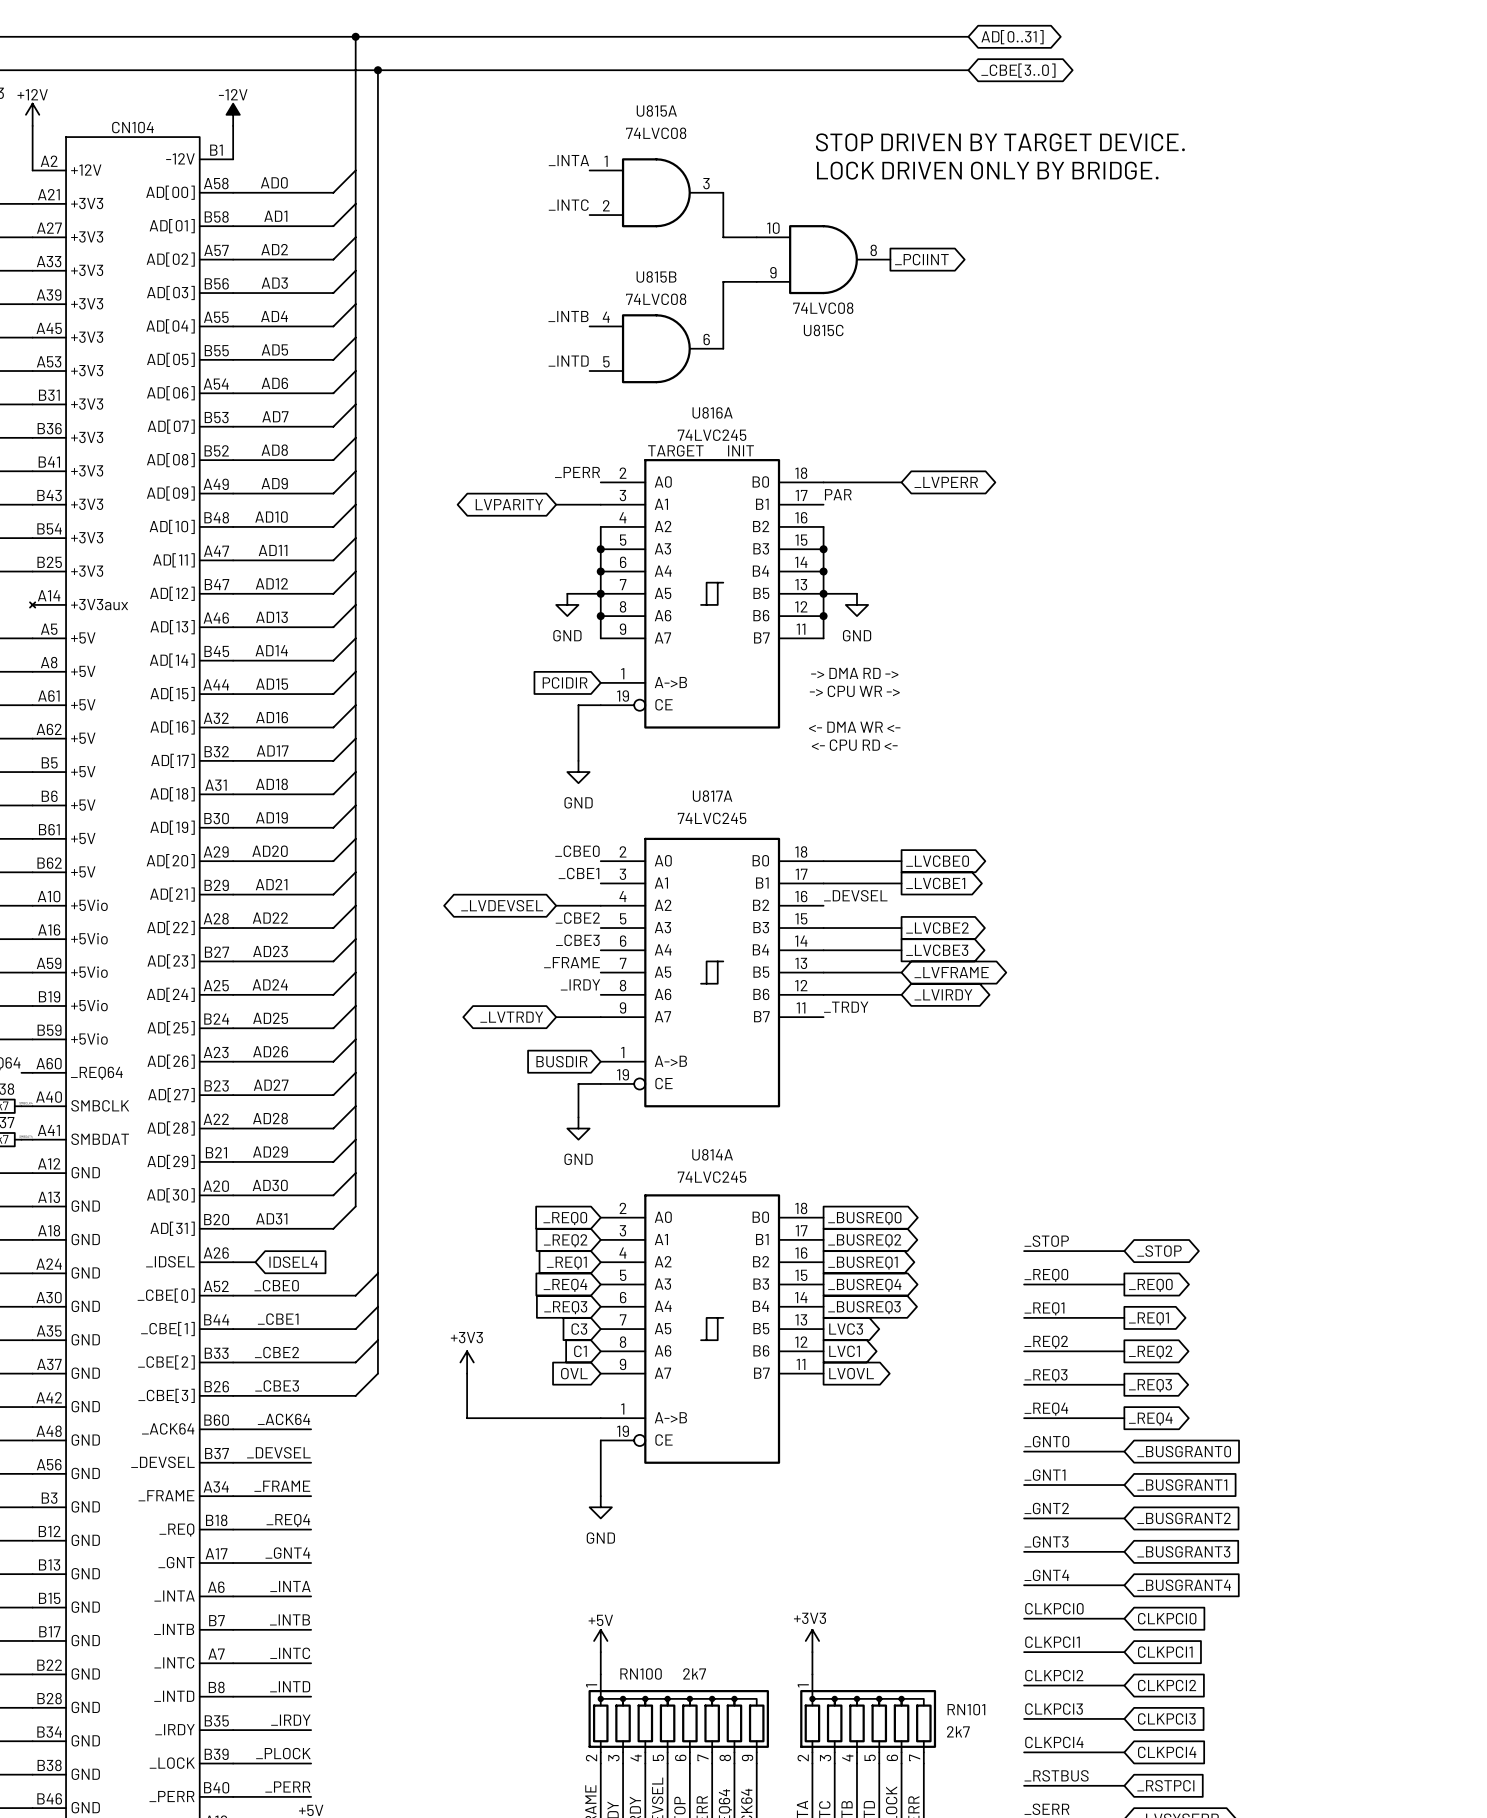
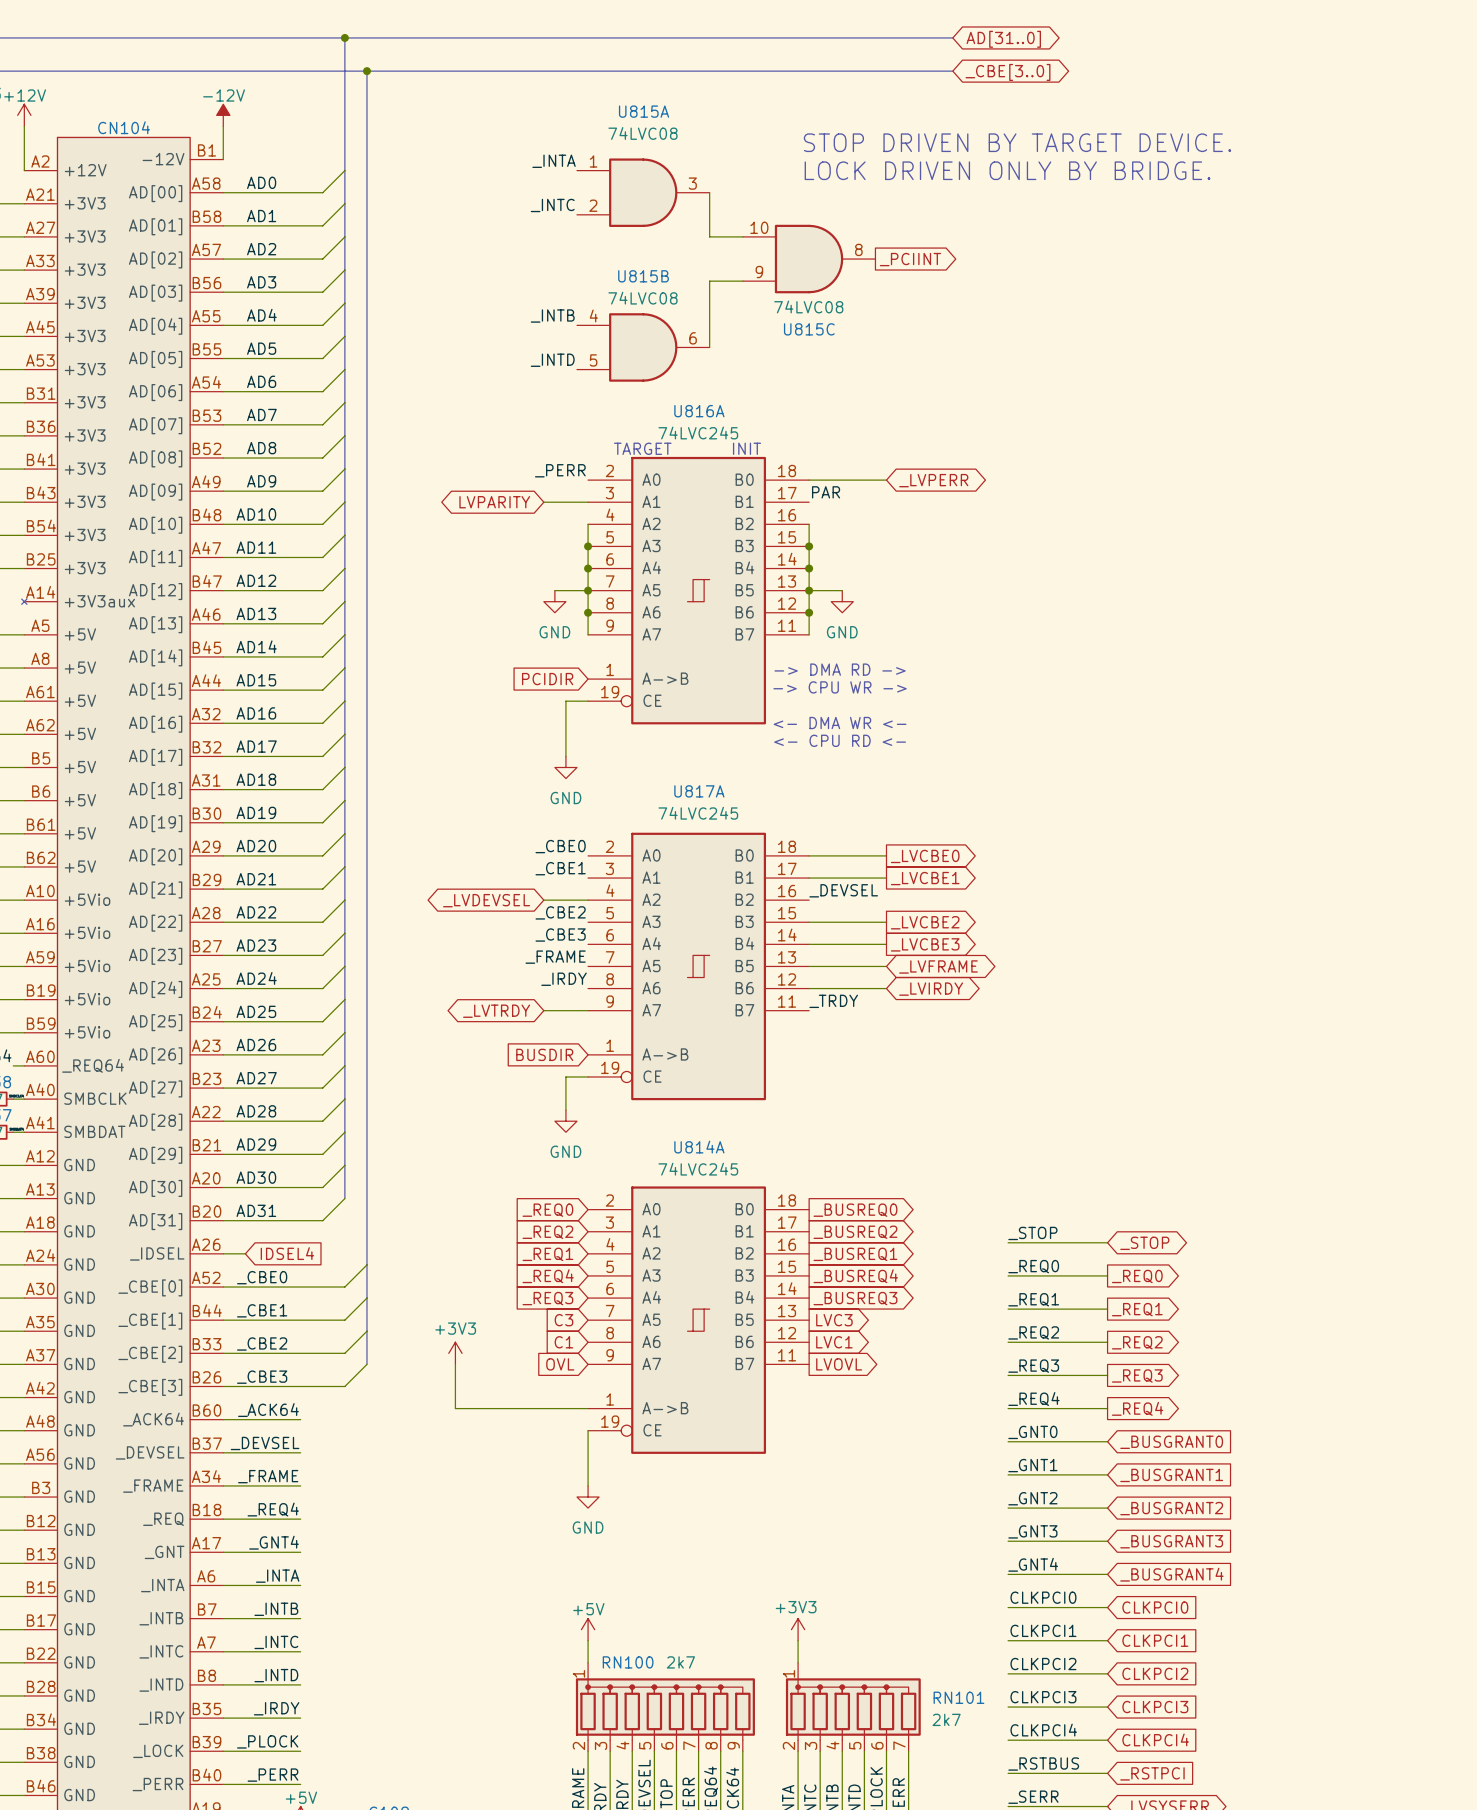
global label: AD[0..31] (1012, 37) -> AD[31..0] (1003, 39)

